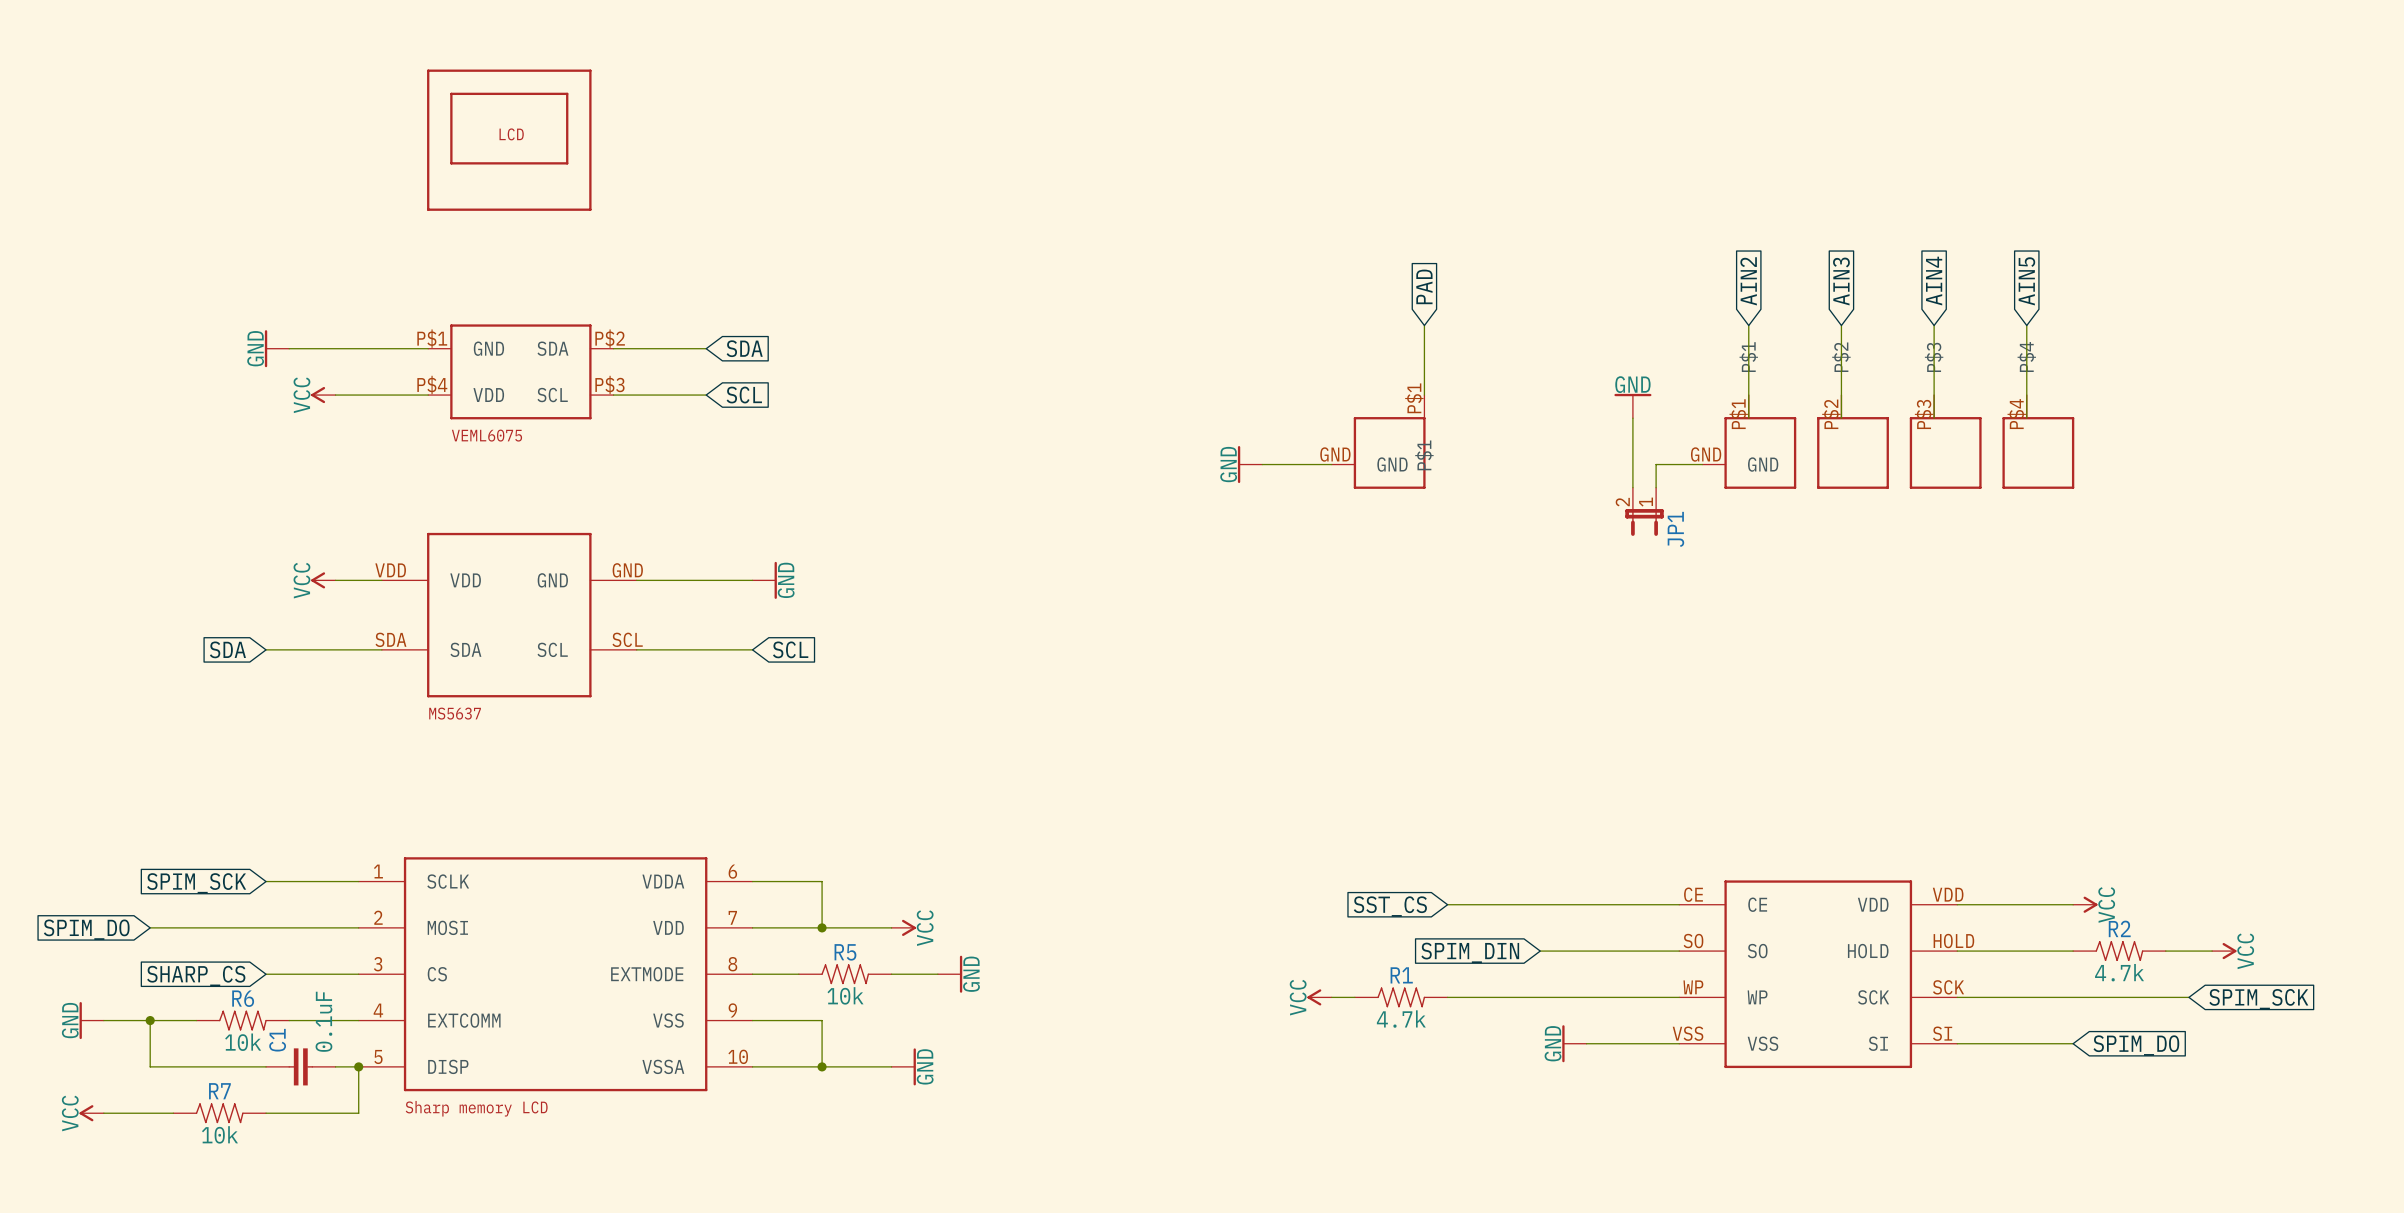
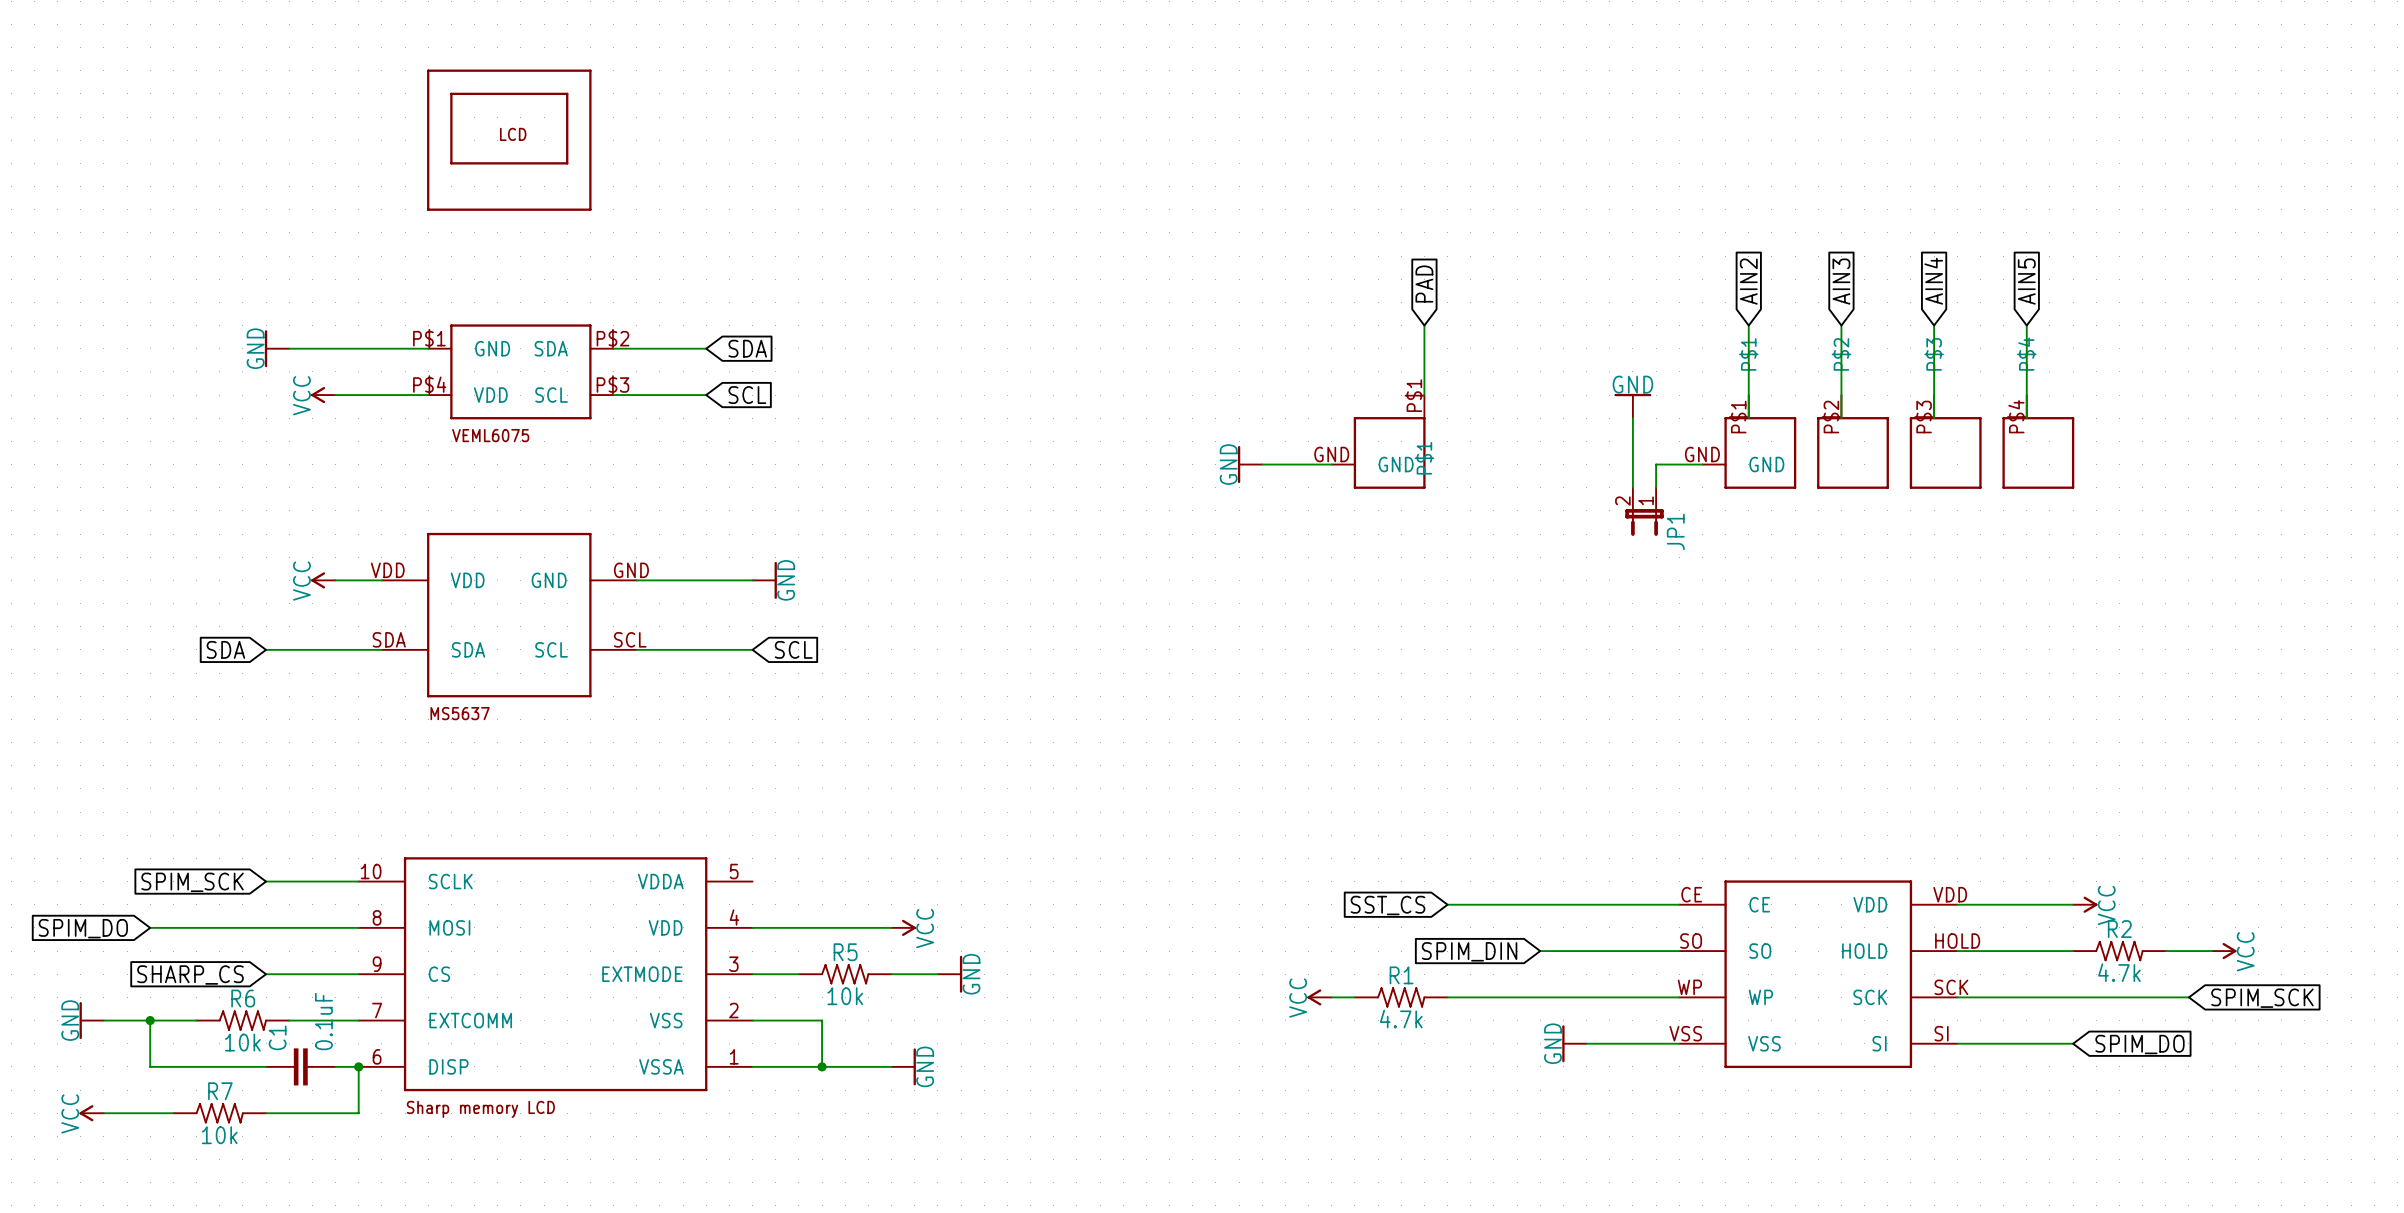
part symbol: [358, 857, 753, 1092] -> [358, 857, 753, 1092]
wire: (752, 881) (822, 881) (822, 927) -> none
junction: (822, 927) -> none

